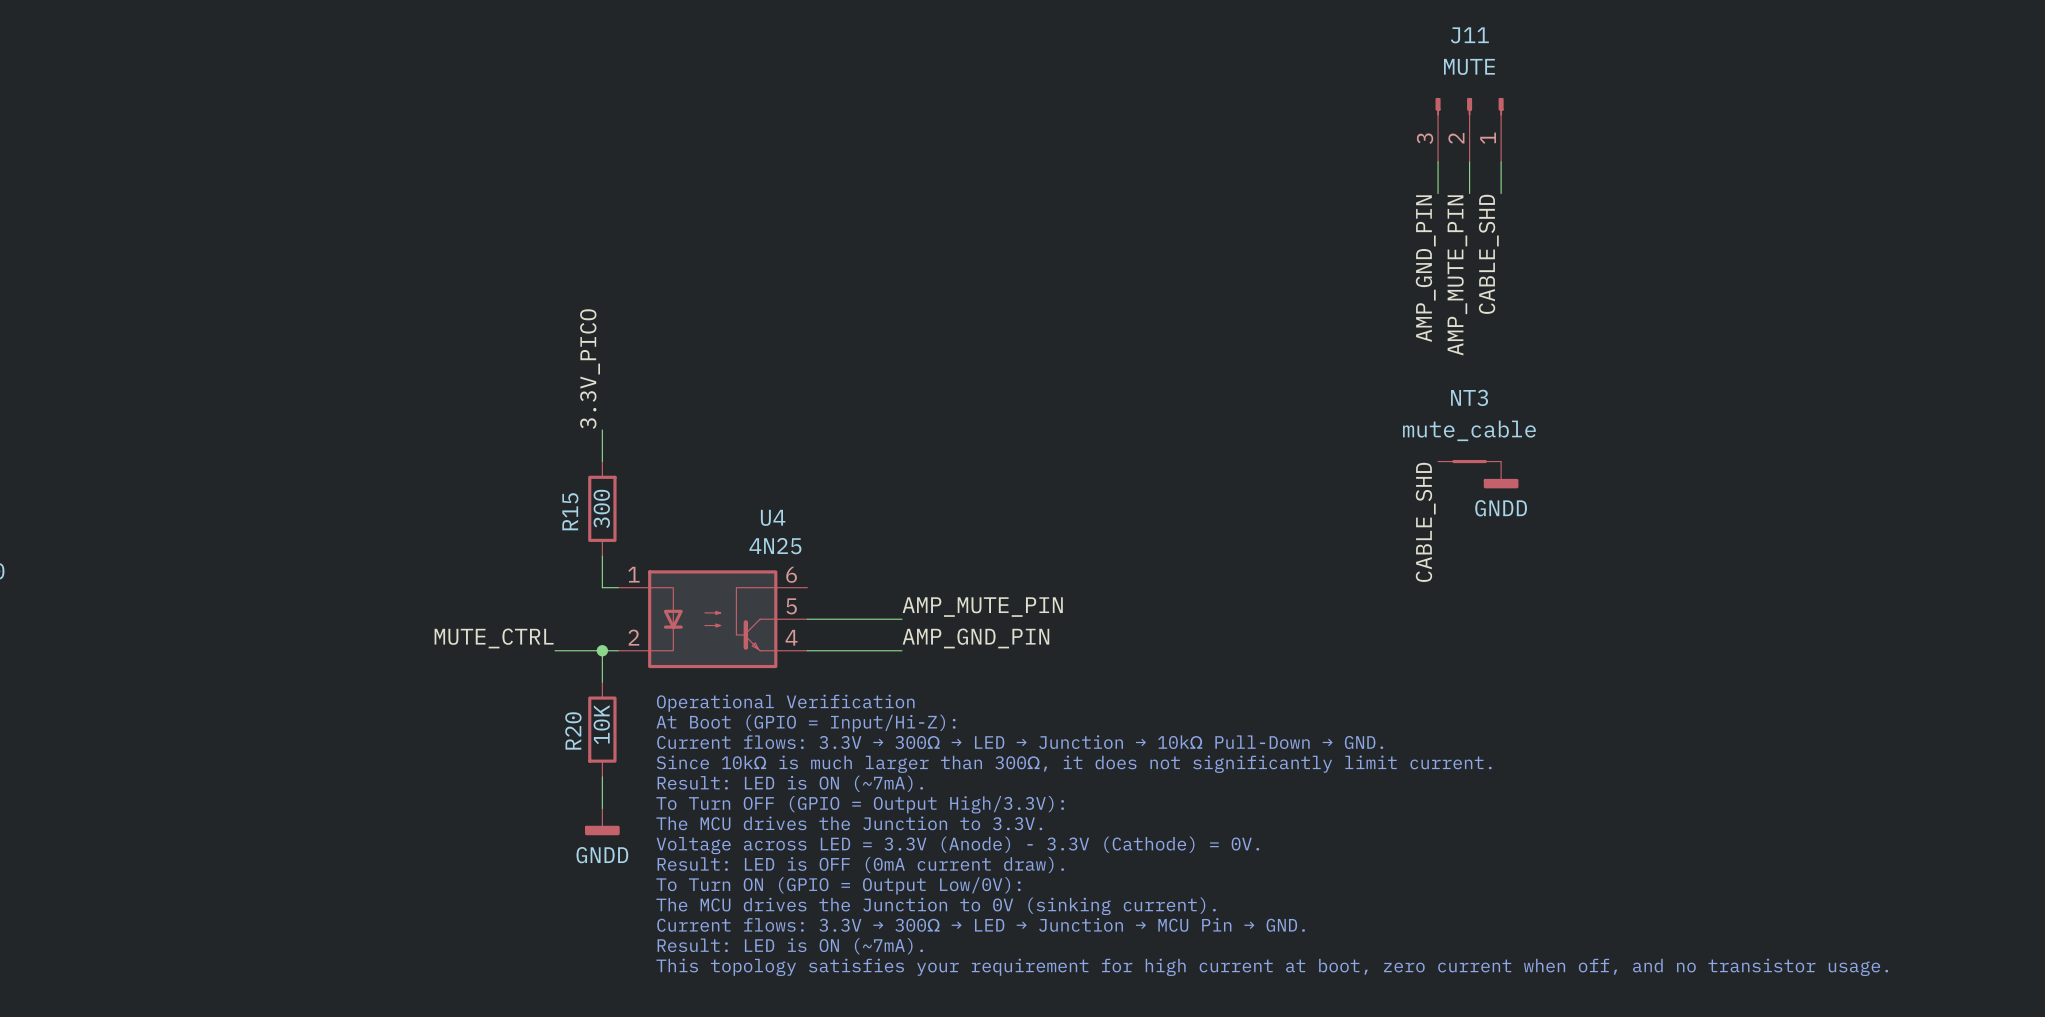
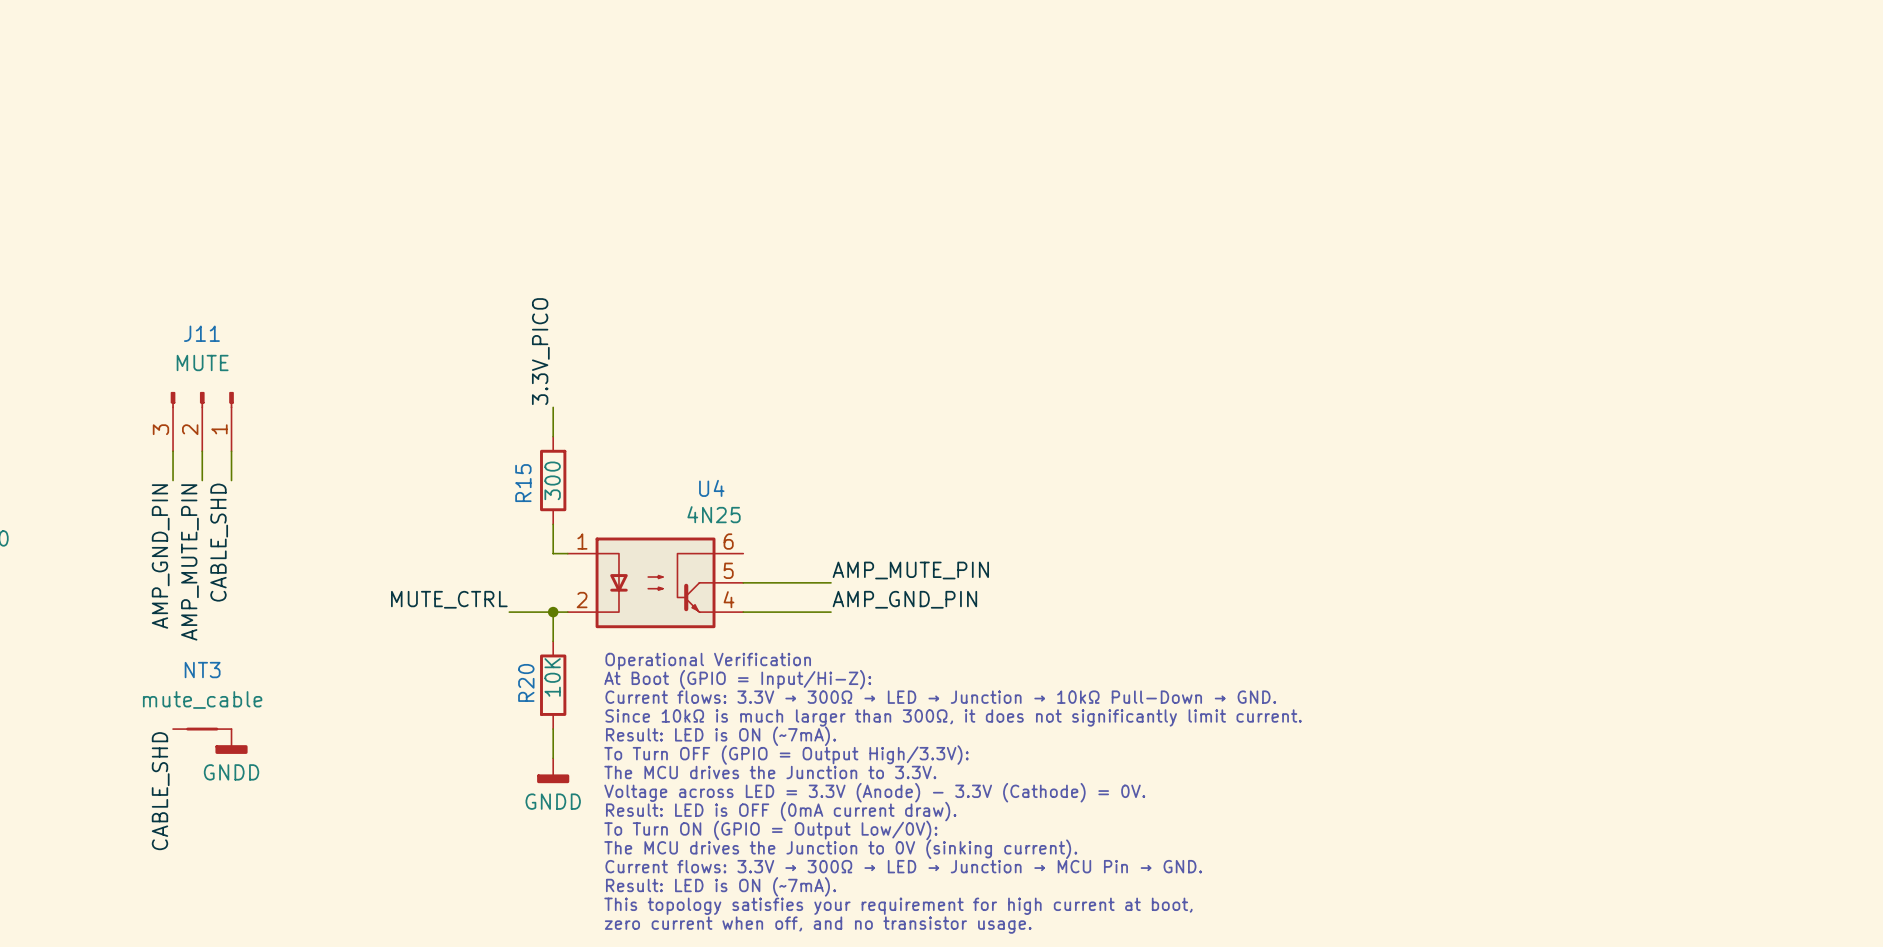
J11 position: (1469, 129) -> (202, 421)
wire: (1438, 161) (1438, 193) -> none
wire: (1469, 161) (1469, 193) -> none
wire: (1501, 161) (1501, 193) -> none
label: CABLE_SHD (1488, 254) -> none
label: AMP_GND_PIN (1425, 268) -> none
label: AMP_MUTE_PIN (1457, 275) -> none
NT3 position: (1469, 461) -> (202, 729)
power symbol: GNDD (1501, 474) -> none
wire: none -> (173, 451) (173, 480)
wire: none -> (202, 451) (202, 480)
wire: none -> (231, 451) (231, 480)
label: CABLE_SHD (1425, 522) -> none
label: none -> CABLE_SHD (219, 542)
label: none -> AMP_GND_PIN (160, 556)
label: none -> AMP_MUTE_PIN (189, 562)
power symbol: none -> GNDD (231, 741)
label: none -> CABLE_SHD (160, 791)
text: This topology satisfies your requirement for high current at boot, zero current when off, and no transistor usage. (1272, 967) -> This topology satisfies your requirement for high current at boot, (898, 906)
text: none -> zero current when off, and no transistor usage. (818, 925)

